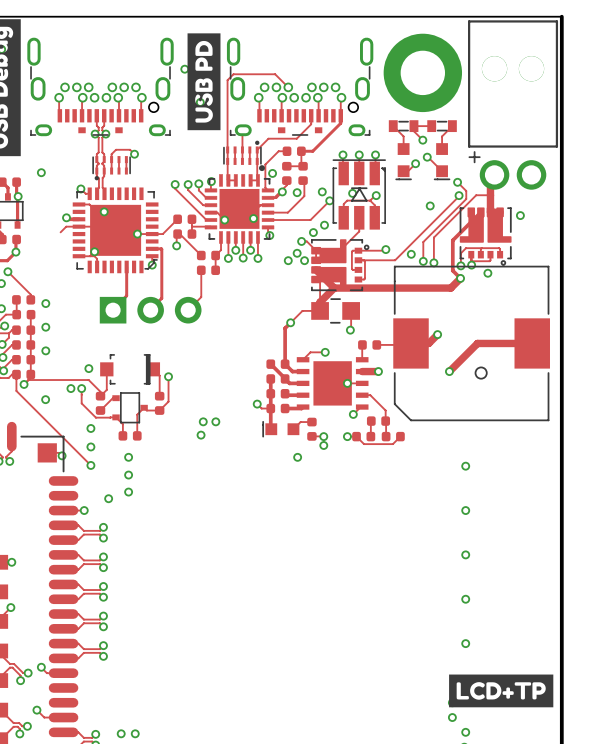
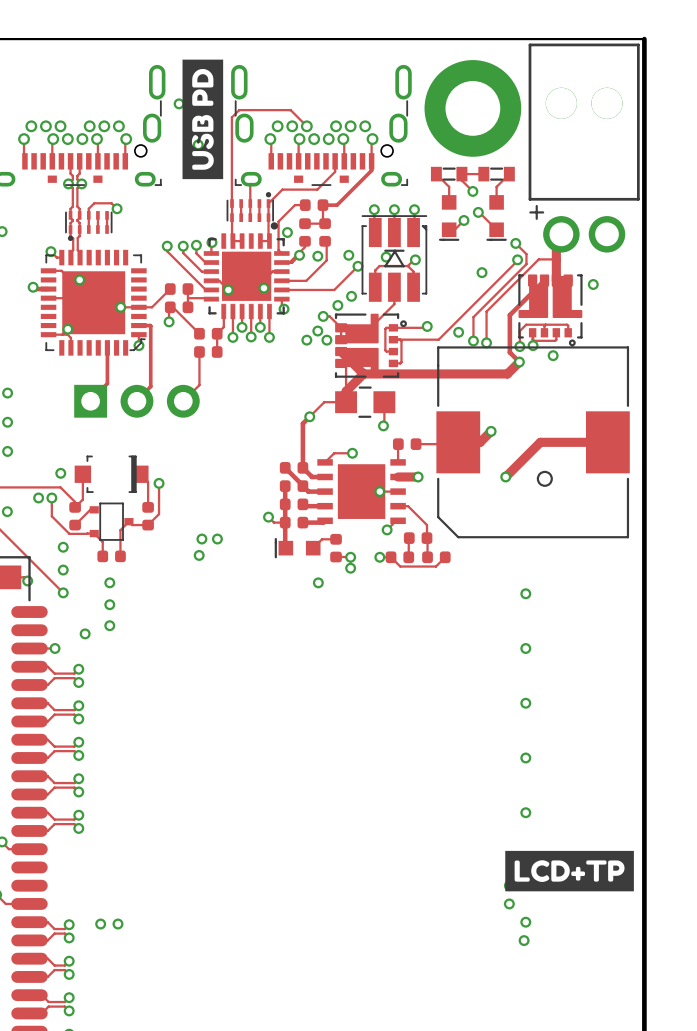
track: (79, 226) (66, 226) (60, 232) -> none

